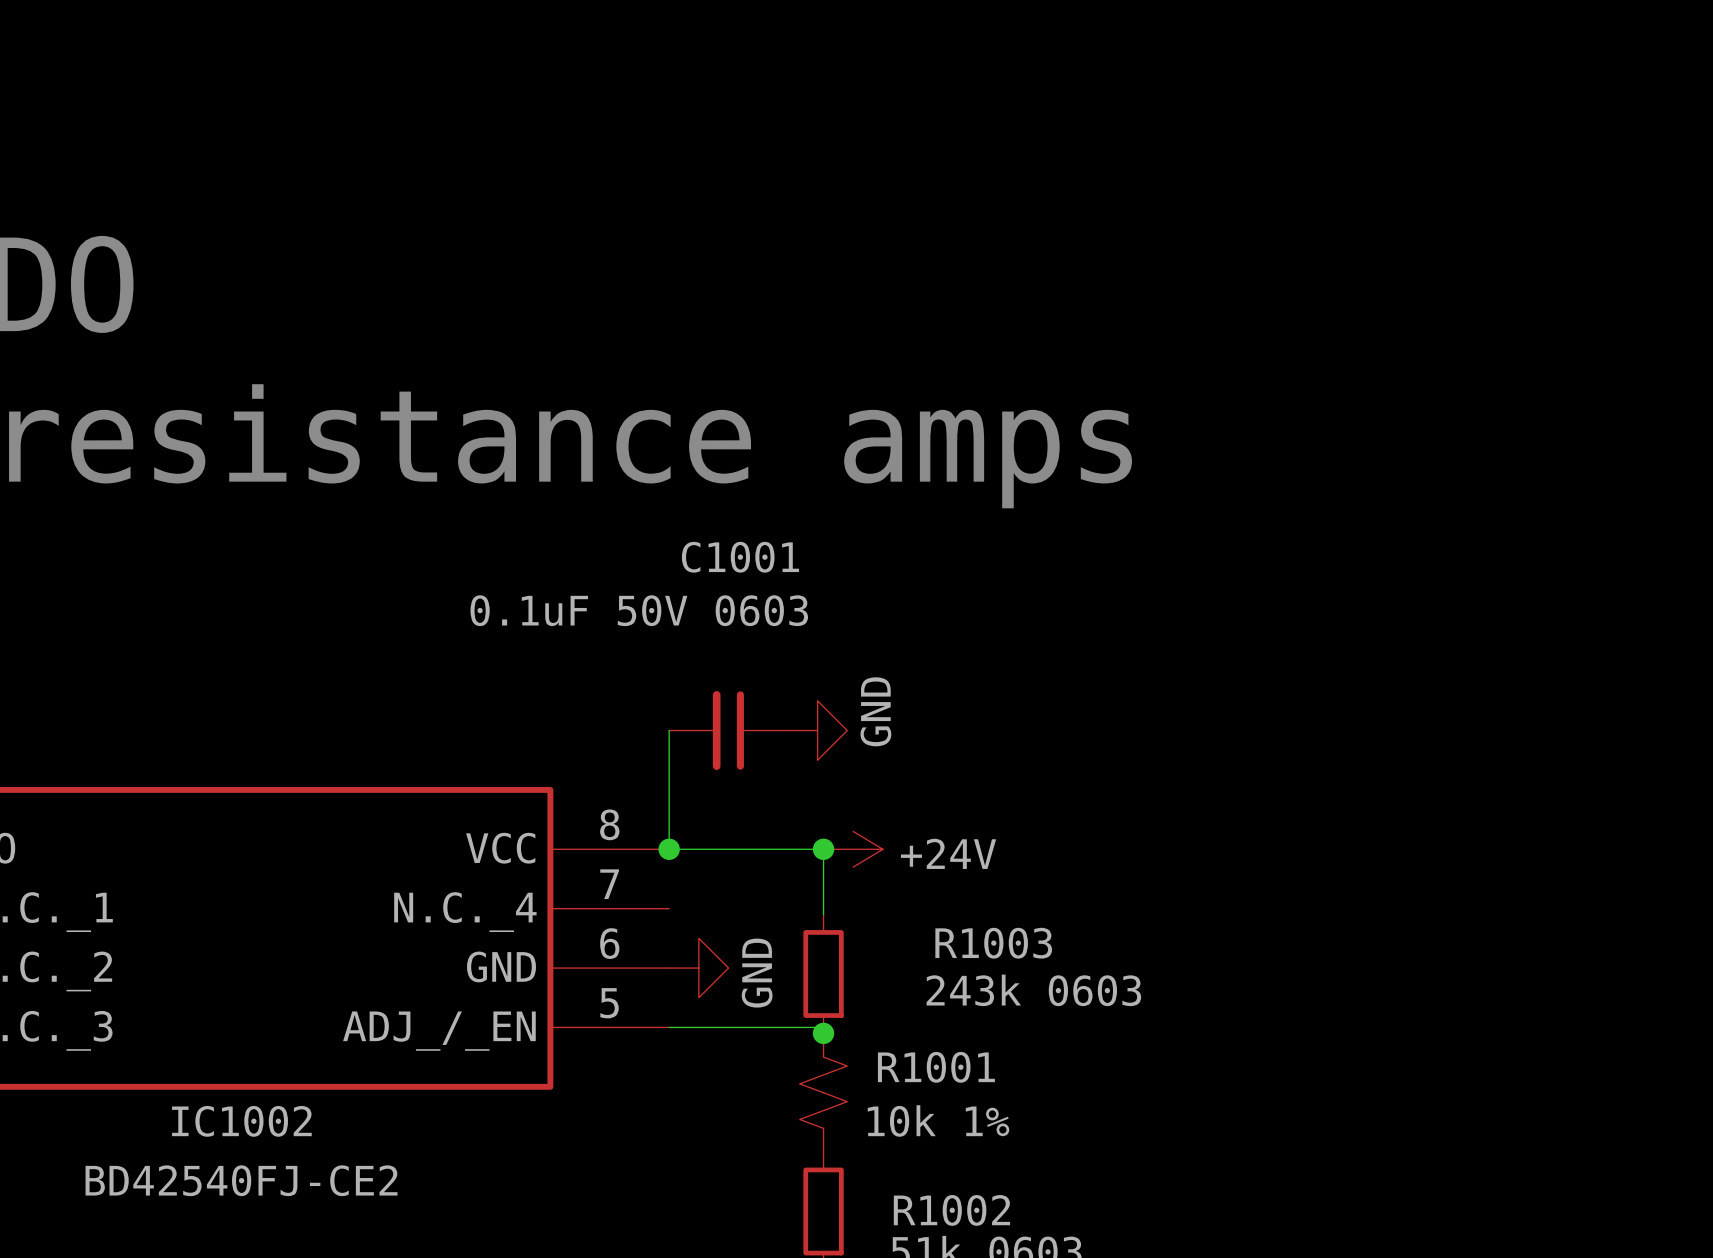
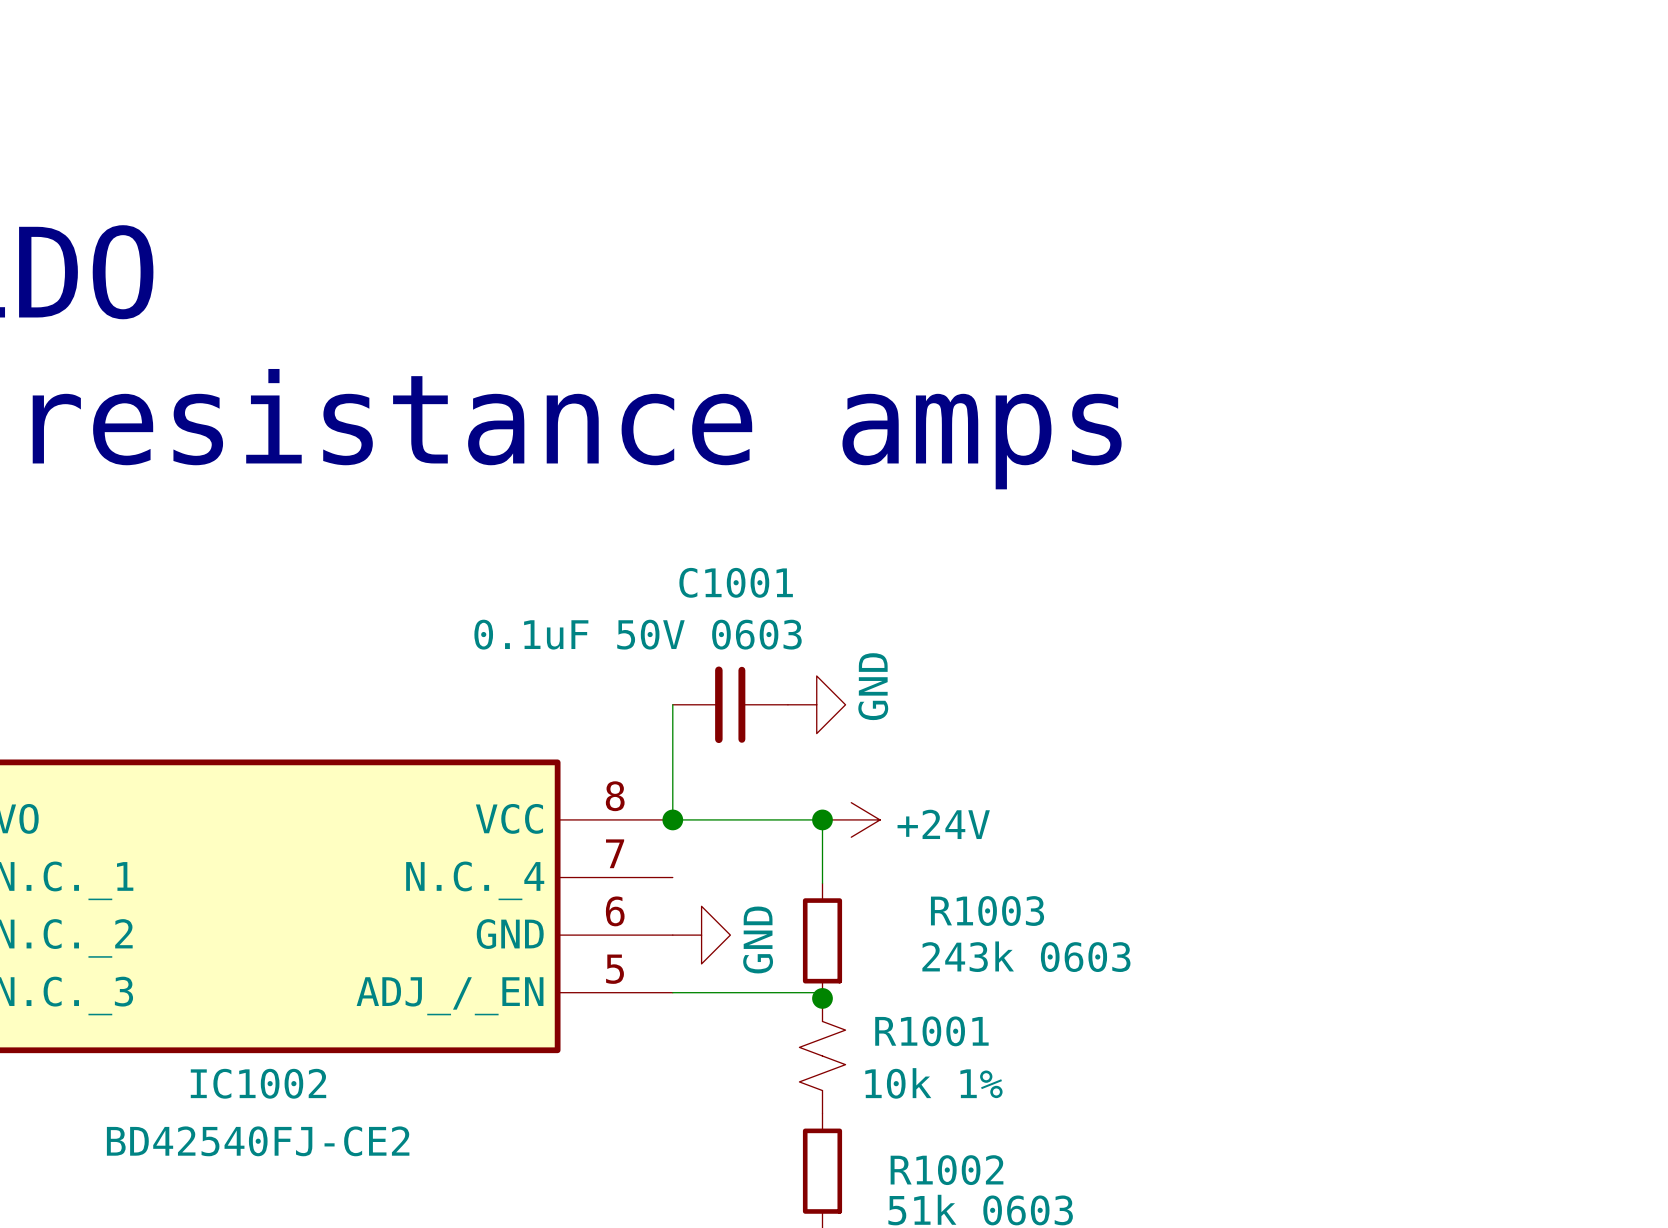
C1001 name position: C1001 (740, 557) -> C1001 (736, 582)
C1001 value position: 0.1uF 50V 0603 (639, 610) -> 0.1uF 50V 0603 (638, 634)

